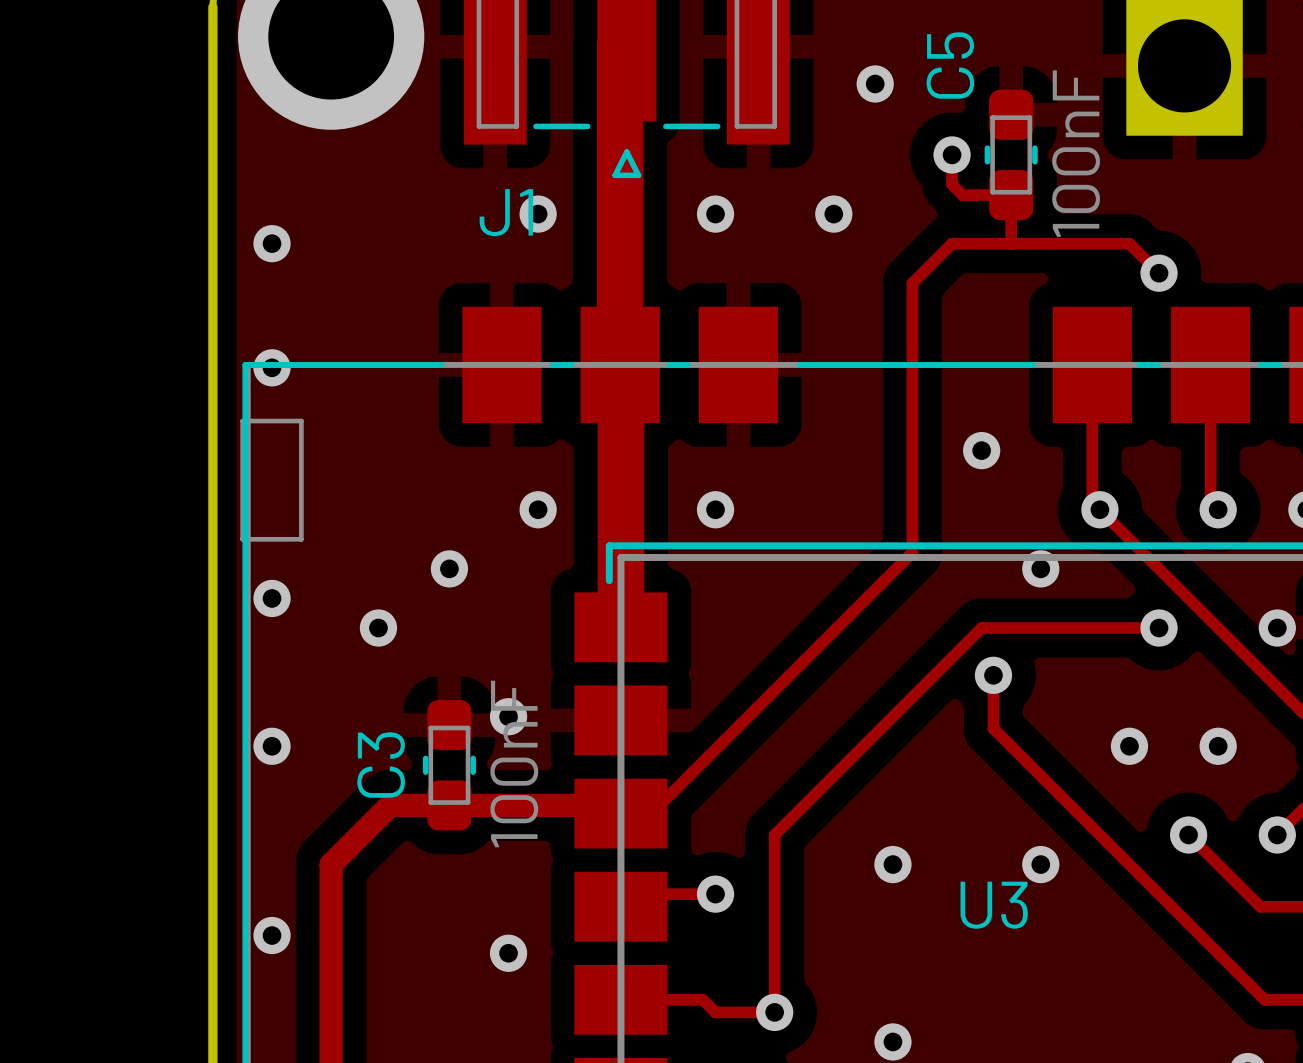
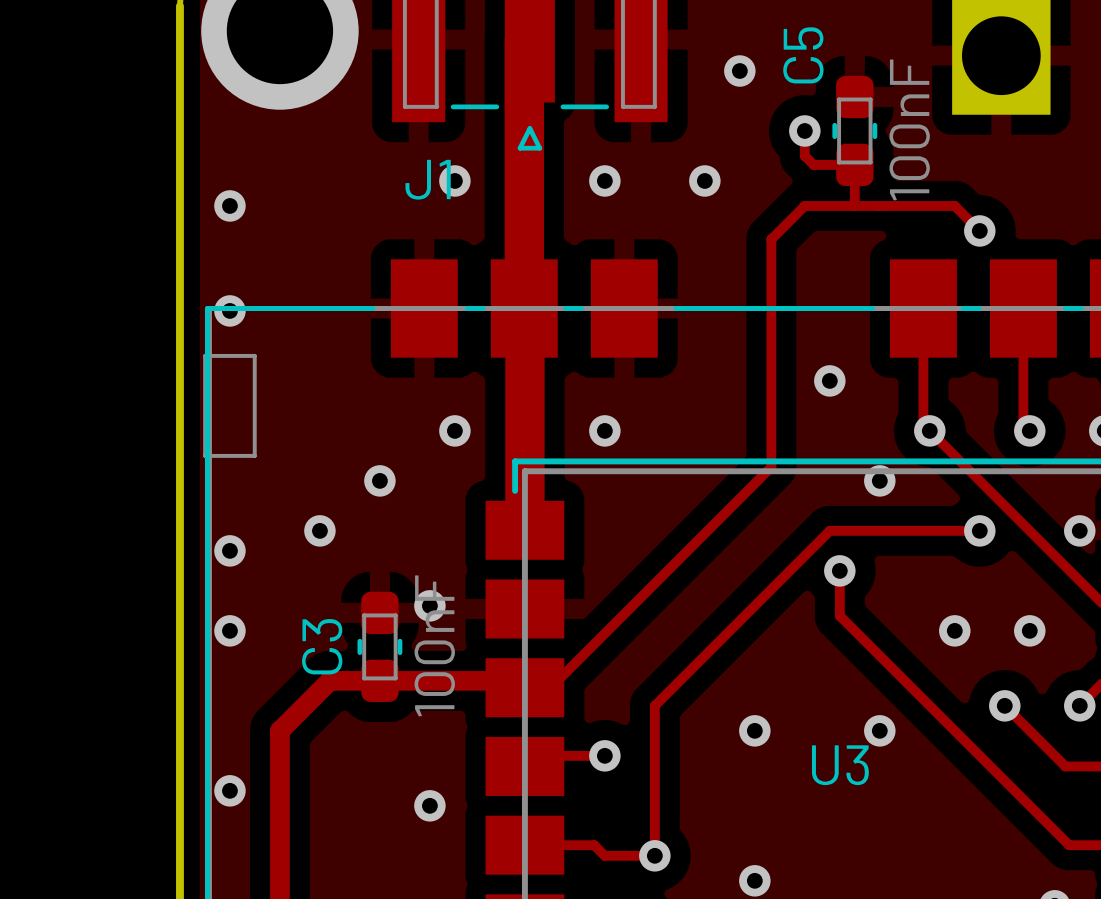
via position: (272, 598) -> (229, 550)

